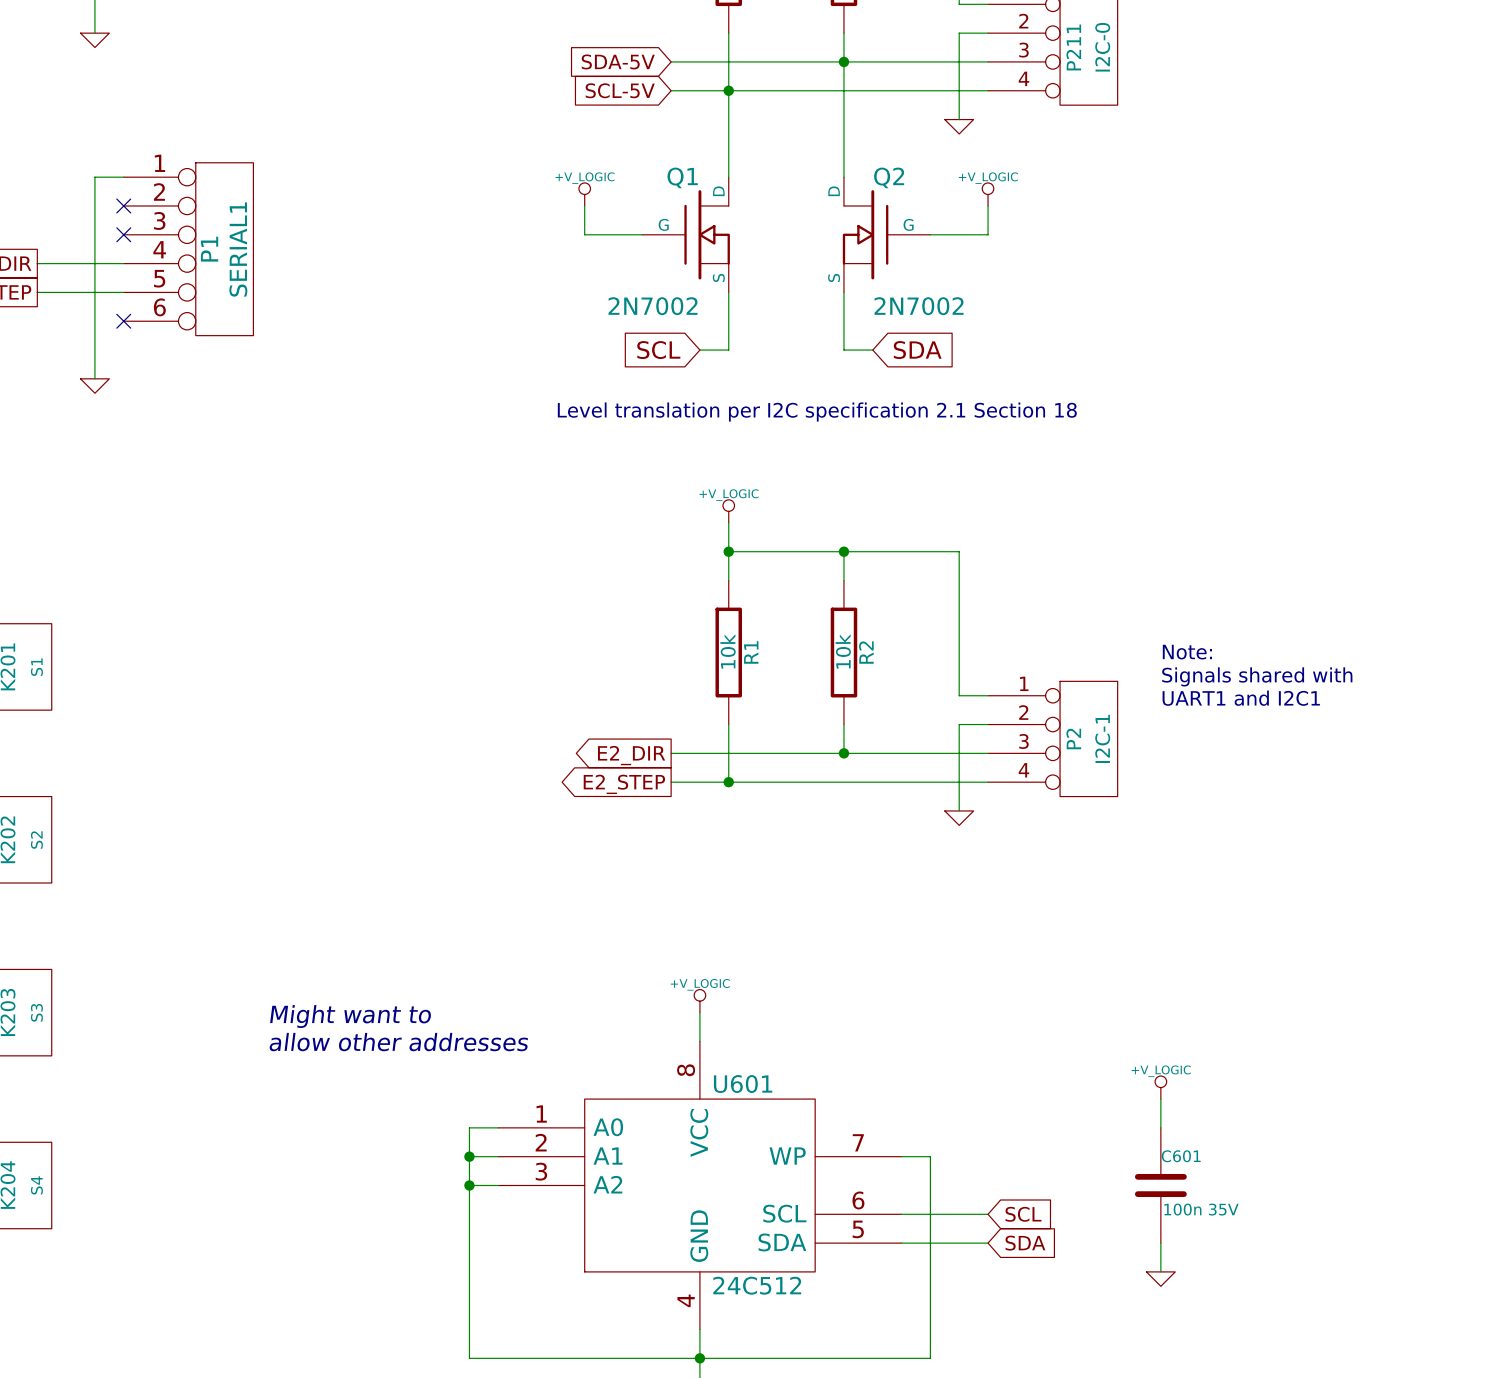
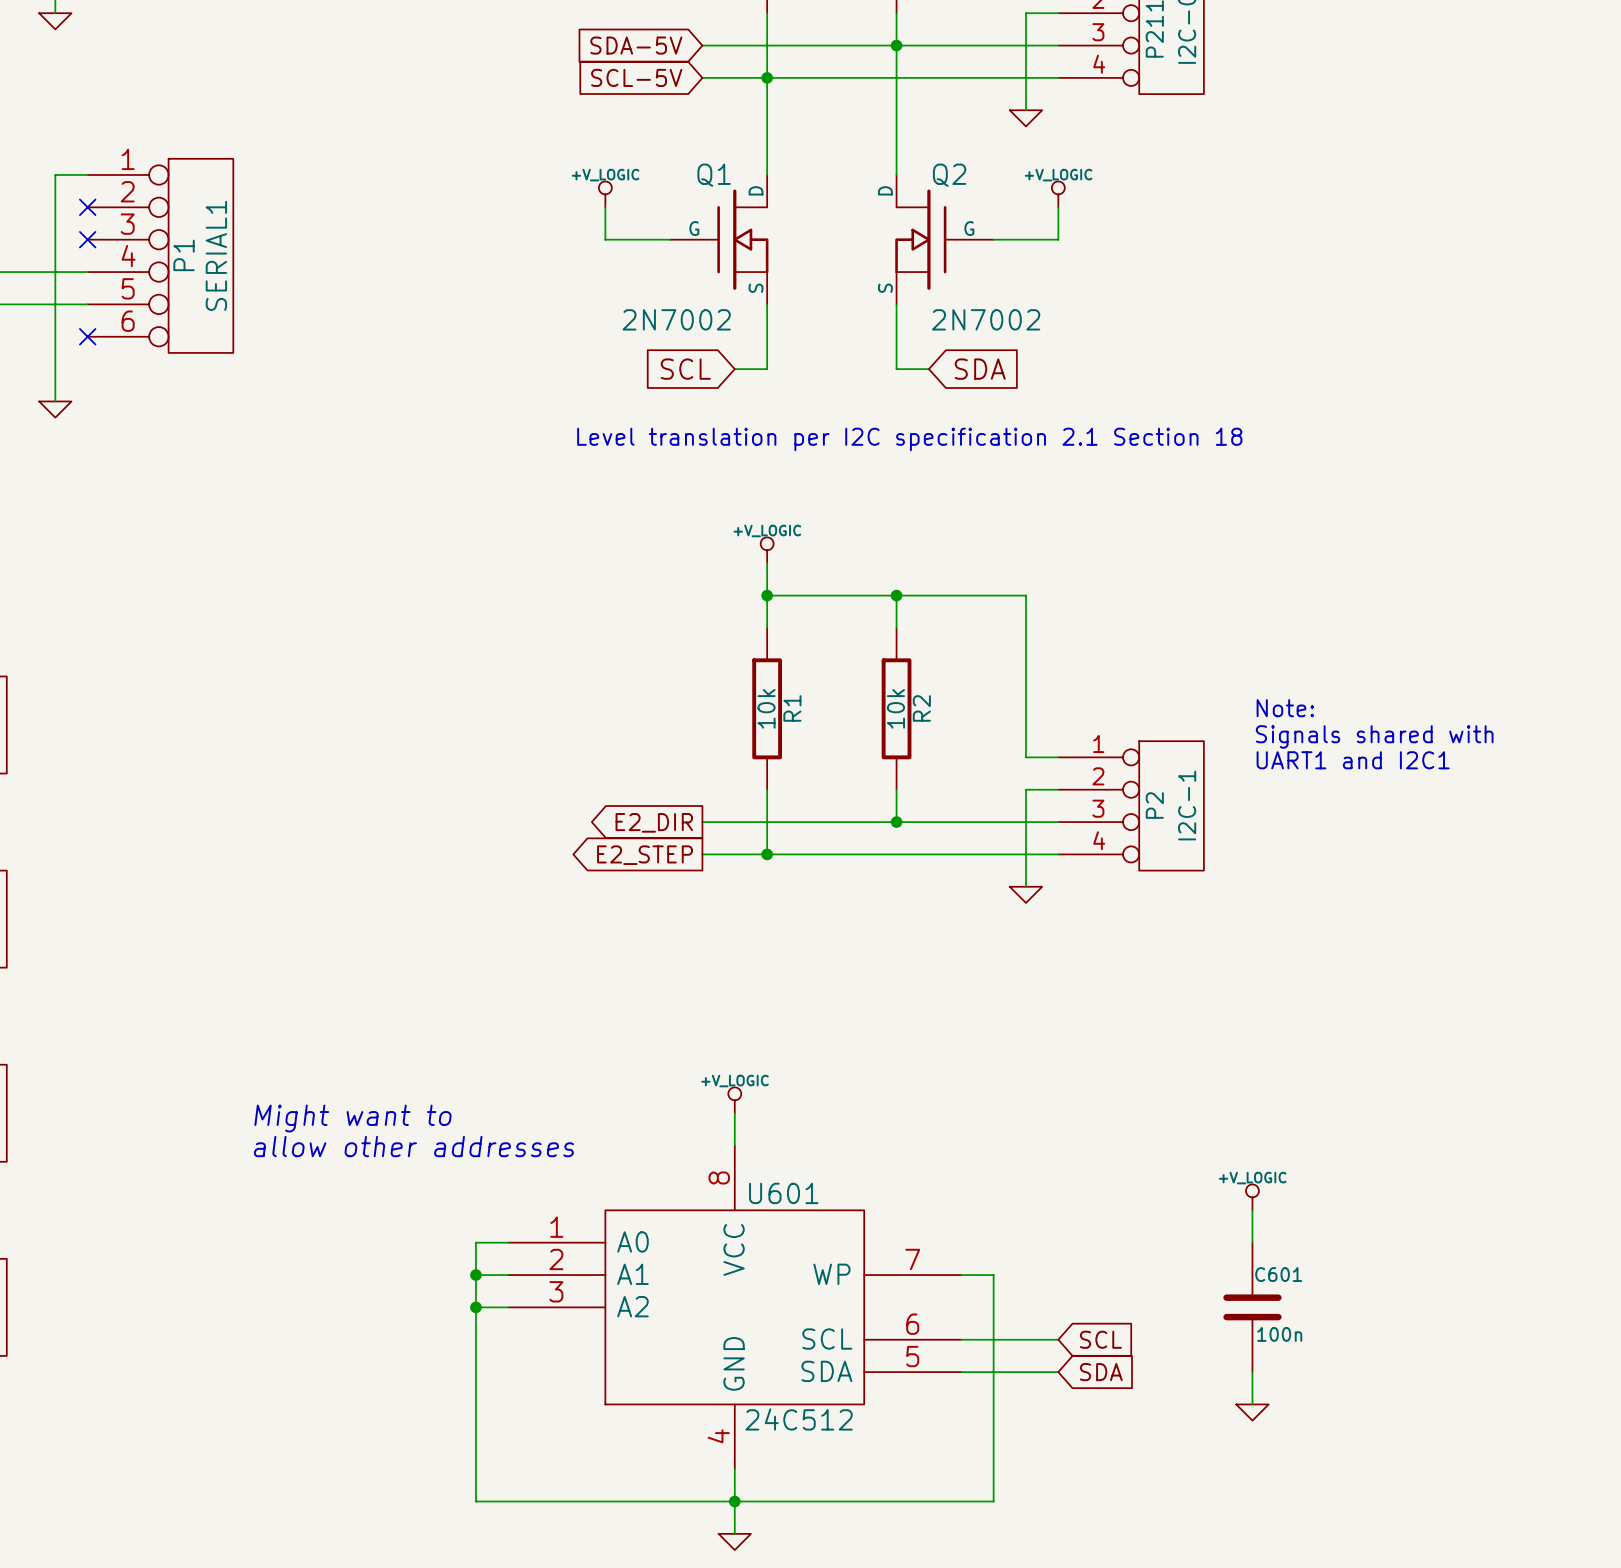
C601 value: 100n 35V (1201, 1209) -> 100n (1279, 1334)

